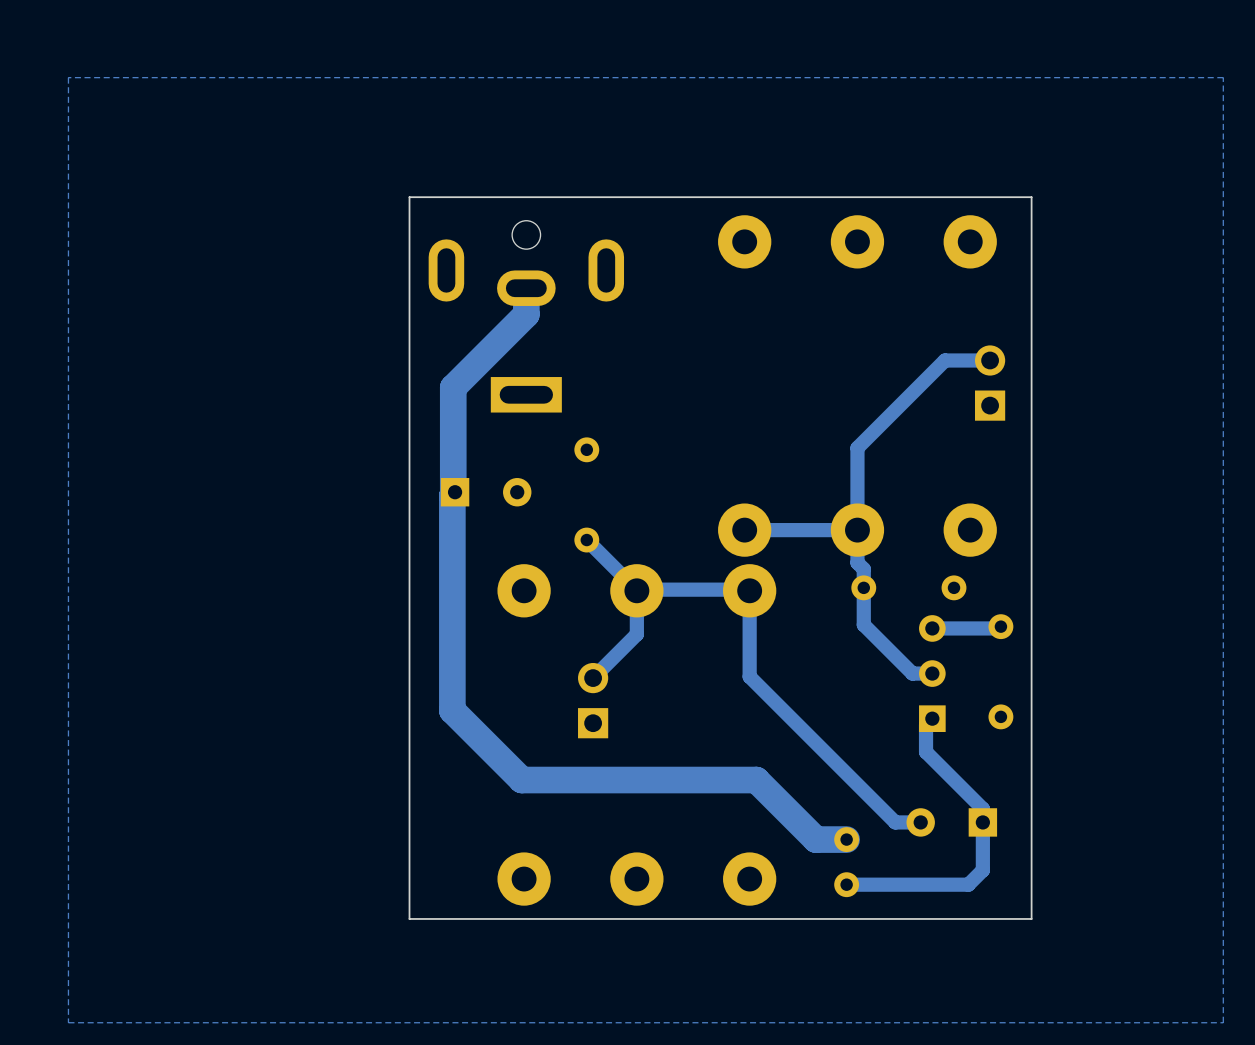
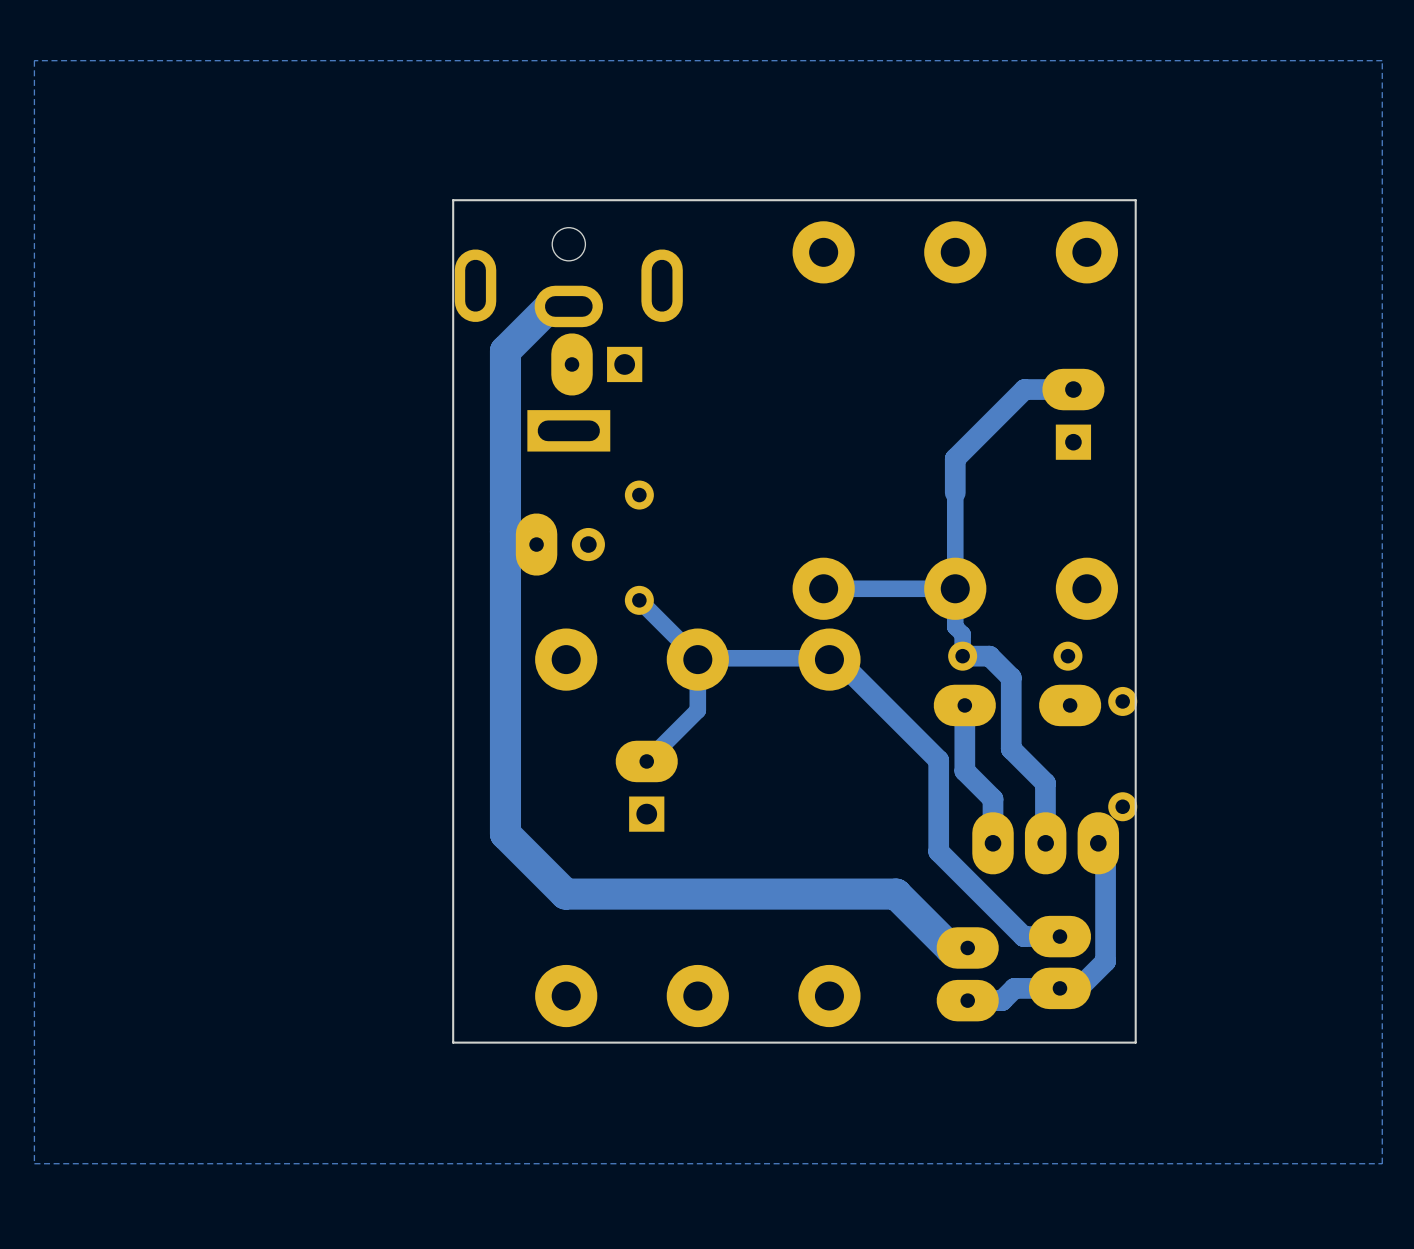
board edge: (427, 197) (409, 197) (409, 918) (427, 918) -> (453, 200) (453, 1042)
board edge: (1012, 197) (1031, 197) (1031, 918) (1012, 918) -> (1135, 200) (1135, 1042)
bottom track: (526, 288) (526, 314) (453, 387) (453, 494) -> (568, 306) (550, 306) (505, 350) (505, 833) (565, 894) (896, 894) (950, 947) (967, 947)
part: none -> (596, 364)
bottom track: (990, 360) (944, 360) (857, 448) -> (1073, 389) (1024, 389) (955, 458) (955, 492)
part: none -> (1073, 414)
part: (990, 383) -> none
bottom track: (455, 492) (452, 495) (452, 710) (521, 780) (756, 780) (815, 839) (846, 839) -> none
part: (486, 492) -> none
part: none -> (560, 544)
bottom track: (863, 587) (863, 624) (912, 673) (932, 673) -> (962, 656) (989, 656) (1011, 677) (1011, 748) (1045, 783) (1045, 843)
bottom track: (749, 589) (749, 676) (895, 822) (920, 822) -> (829, 658) (836, 658) (938, 760) (938, 851) (1023, 936) (1059, 936)
bottom track: (1000, 626) (999, 628) (932, 628) -> none
bottom track: none -> (964, 705) (964, 770) (993, 799) (993, 843)
part: none -> (1017, 705)
part footprint: [578, 662, 609, 739] -> [615, 740, 678, 832]
part: (932, 673) -> none
bottom track: (932, 718) (926, 724) (926, 752) (982, 808) (982, 870) (968, 884) (846, 884) -> none
part: none -> (1045, 843)
bottom track: none -> (1098, 843) (1105, 850) (1105, 961) (1078, 988) (1014, 988) (1002, 1000) (967, 1000)
part: (951, 822) -> none
part: none -> (1059, 962)
part: none -> (967, 974)
part: (846, 862) -> none

